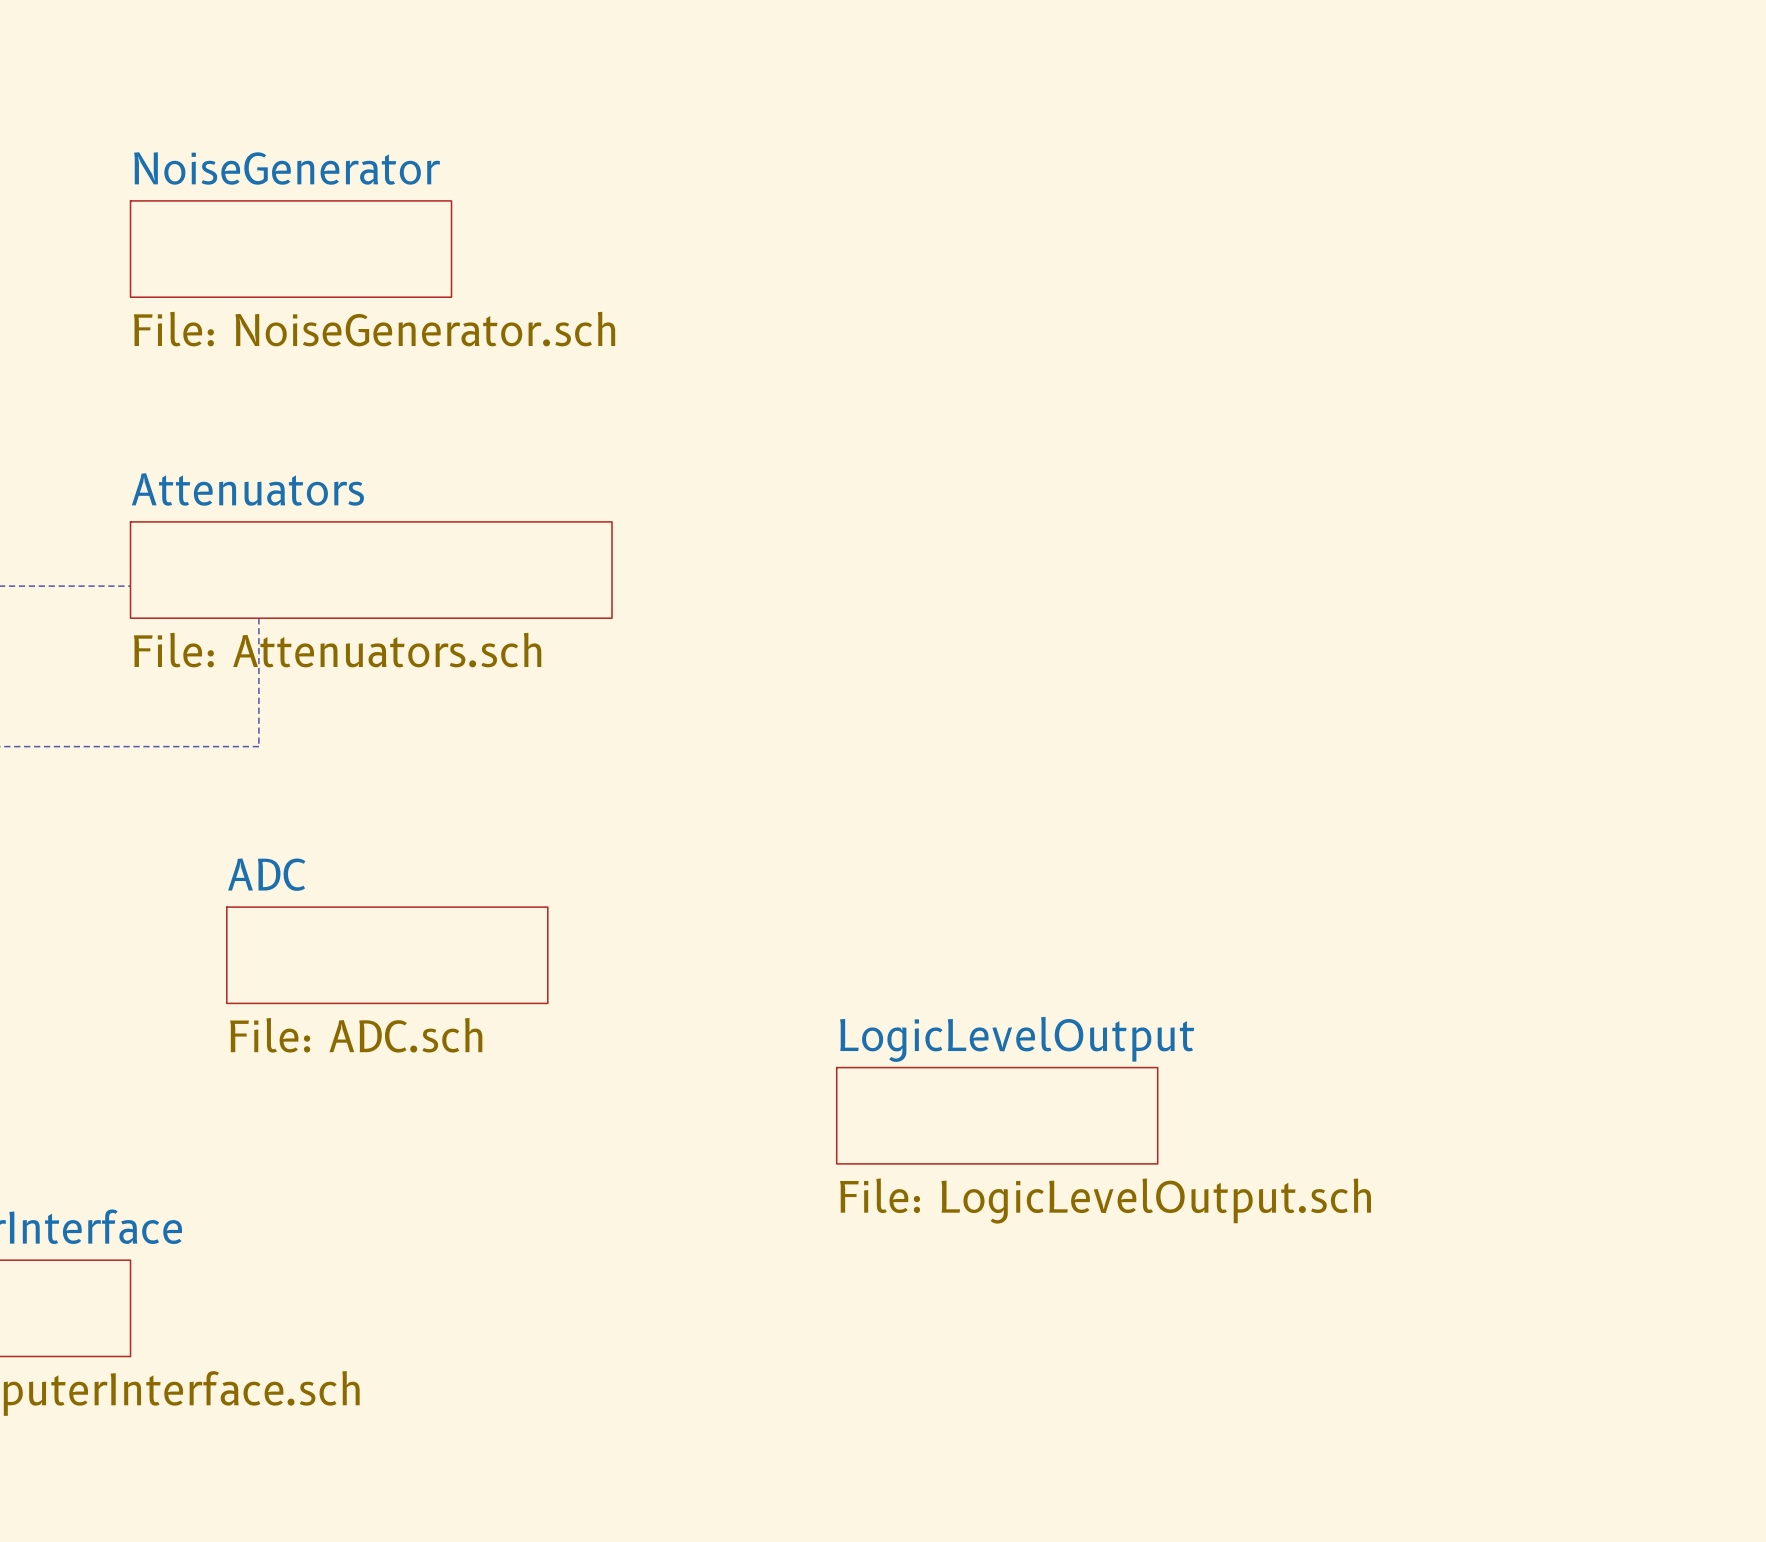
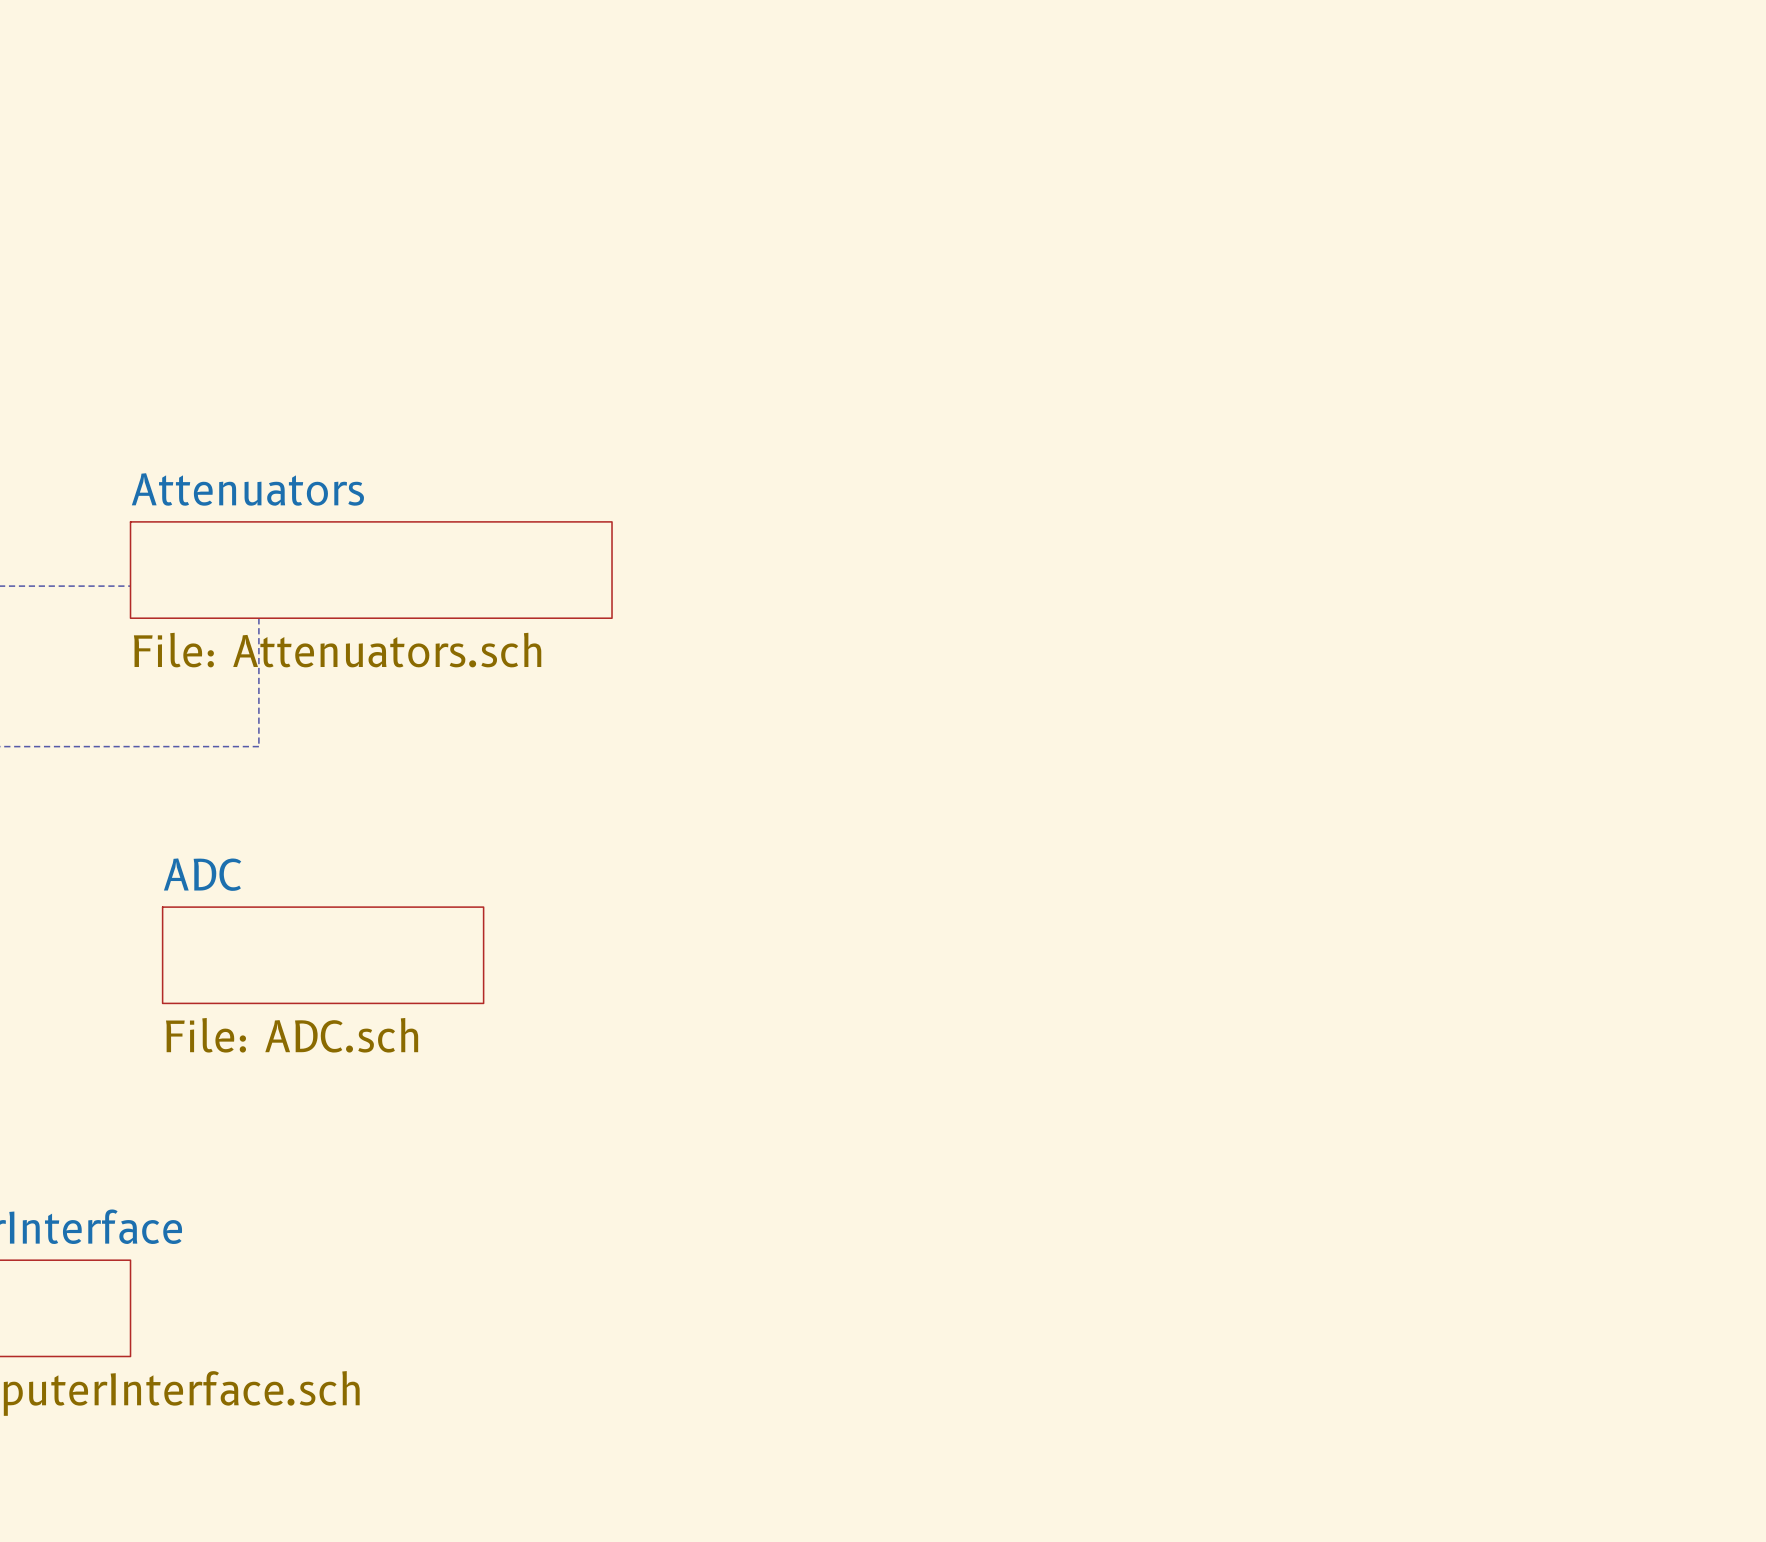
sheet NoiseGenerator: File: NoiseGenerator.sch (291, 249) -> none
sheet ADC position: (387, 955) -> (323, 955)
sheet LogicLevelOutput: File: LogicLevelOutput.sch (997, 1115) -> none

